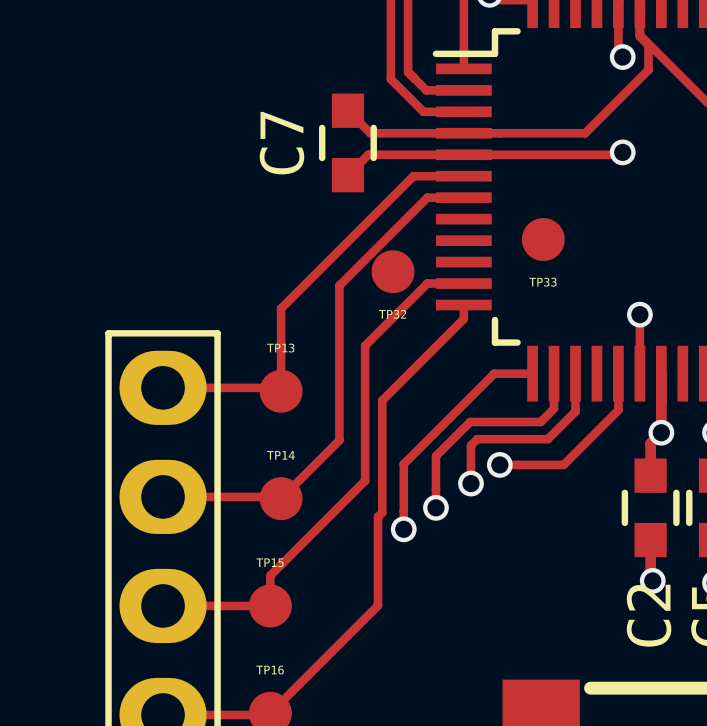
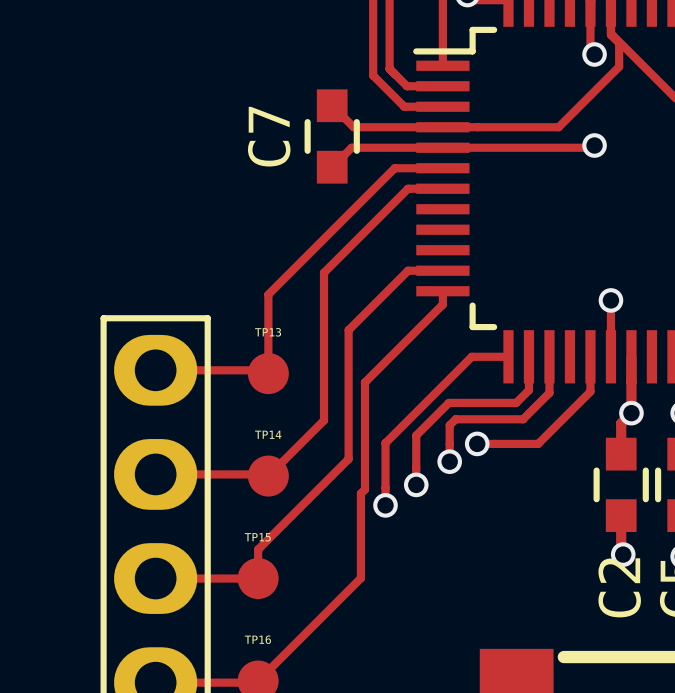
TP33: (543, 239) -> none
TP32: (393, 271) -> none

